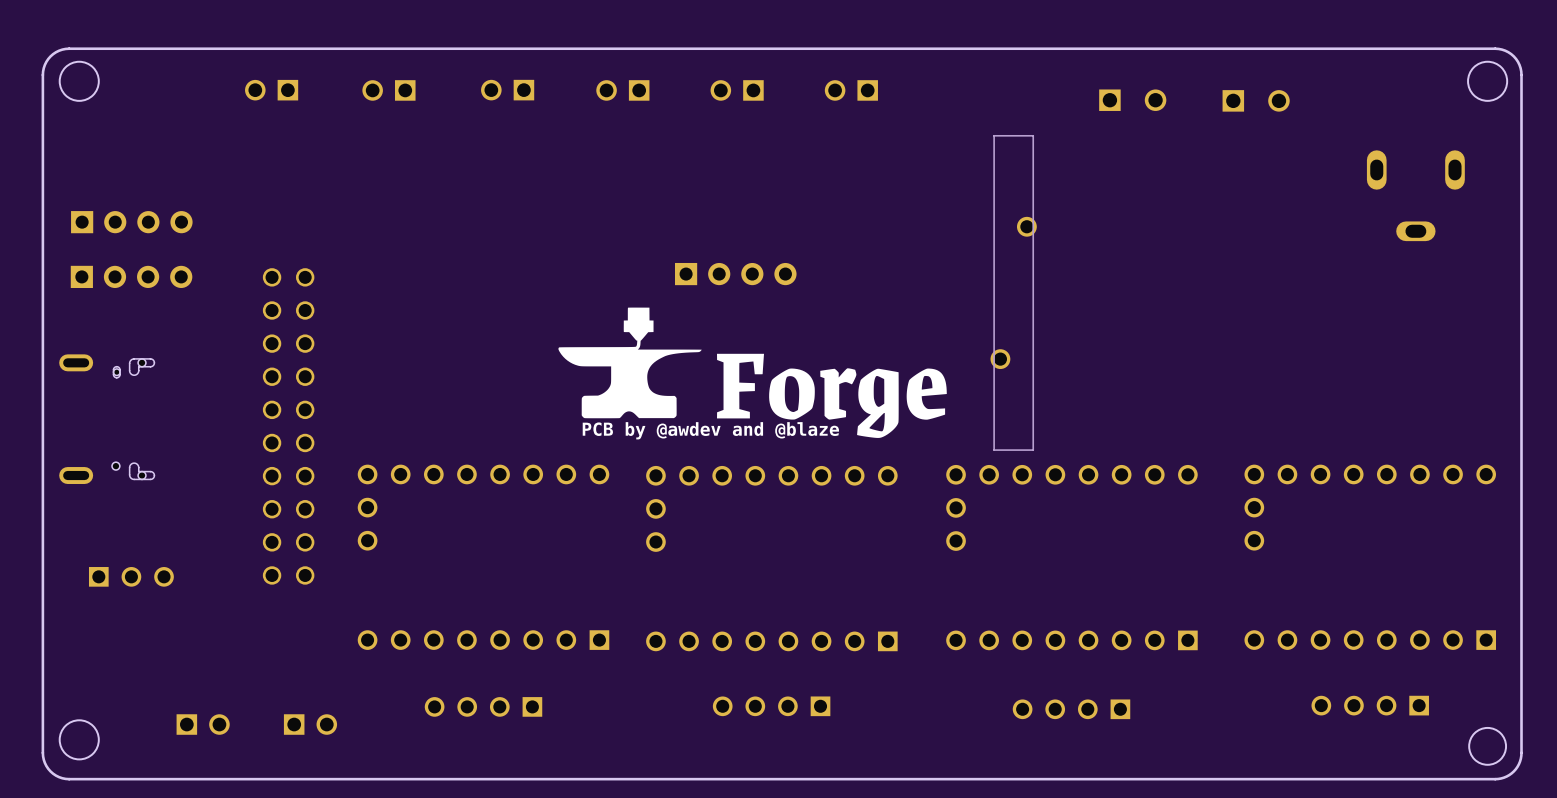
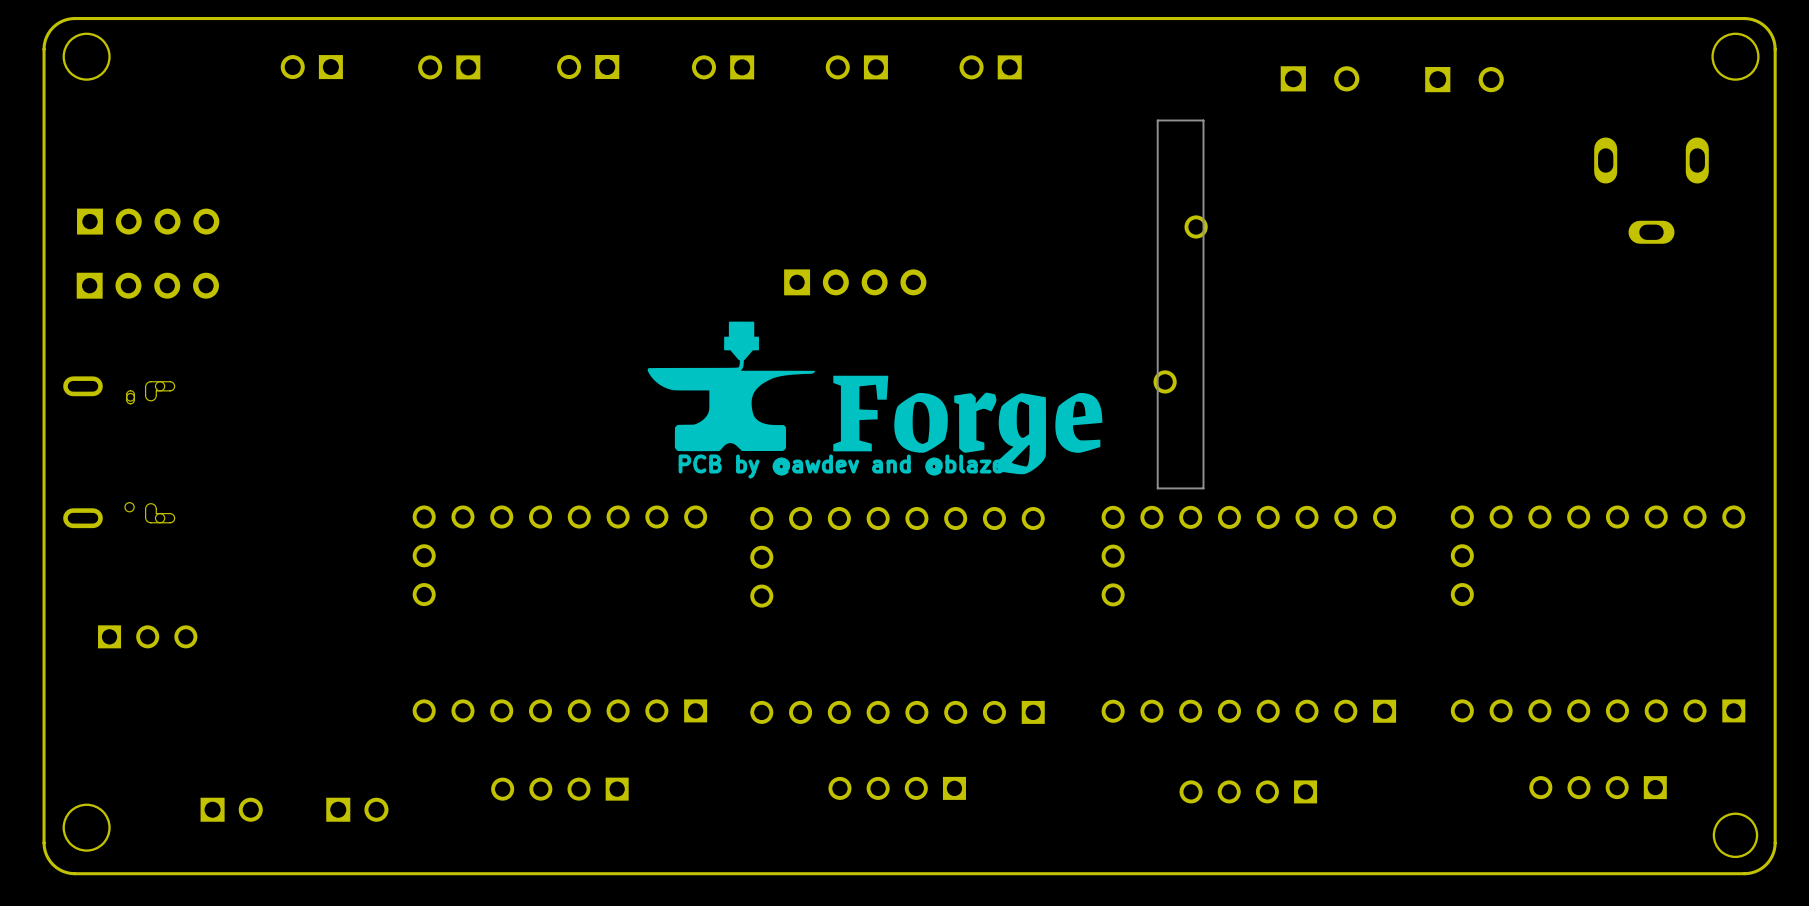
part: (288, 426) -> none

